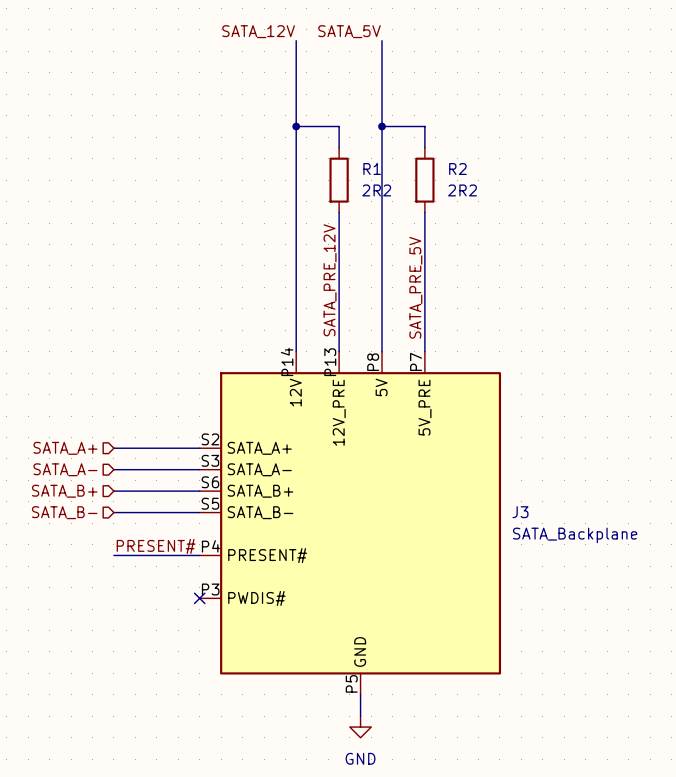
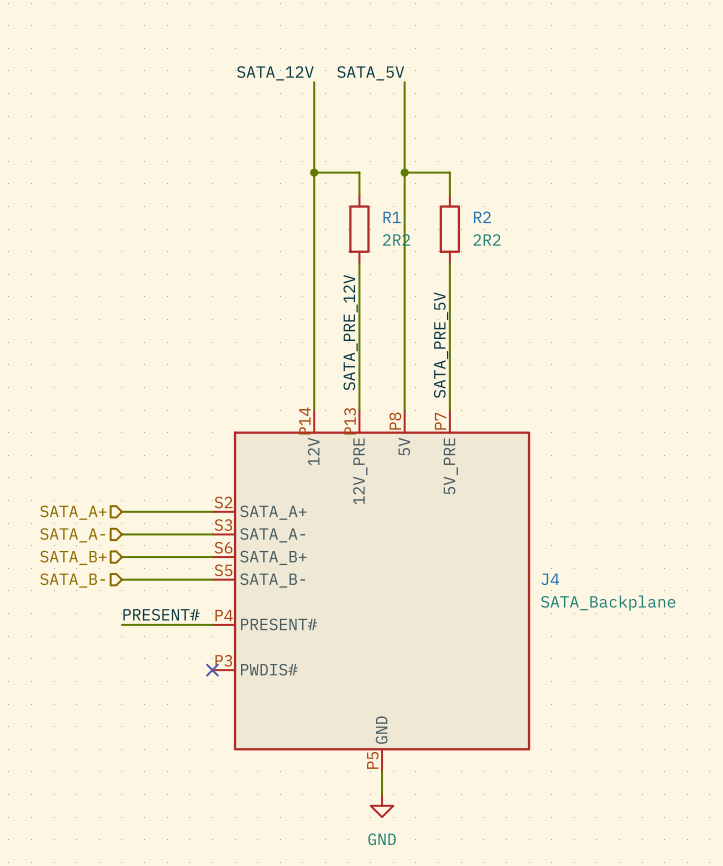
J3 name: J3 (520, 512) -> J4 (550, 579)

